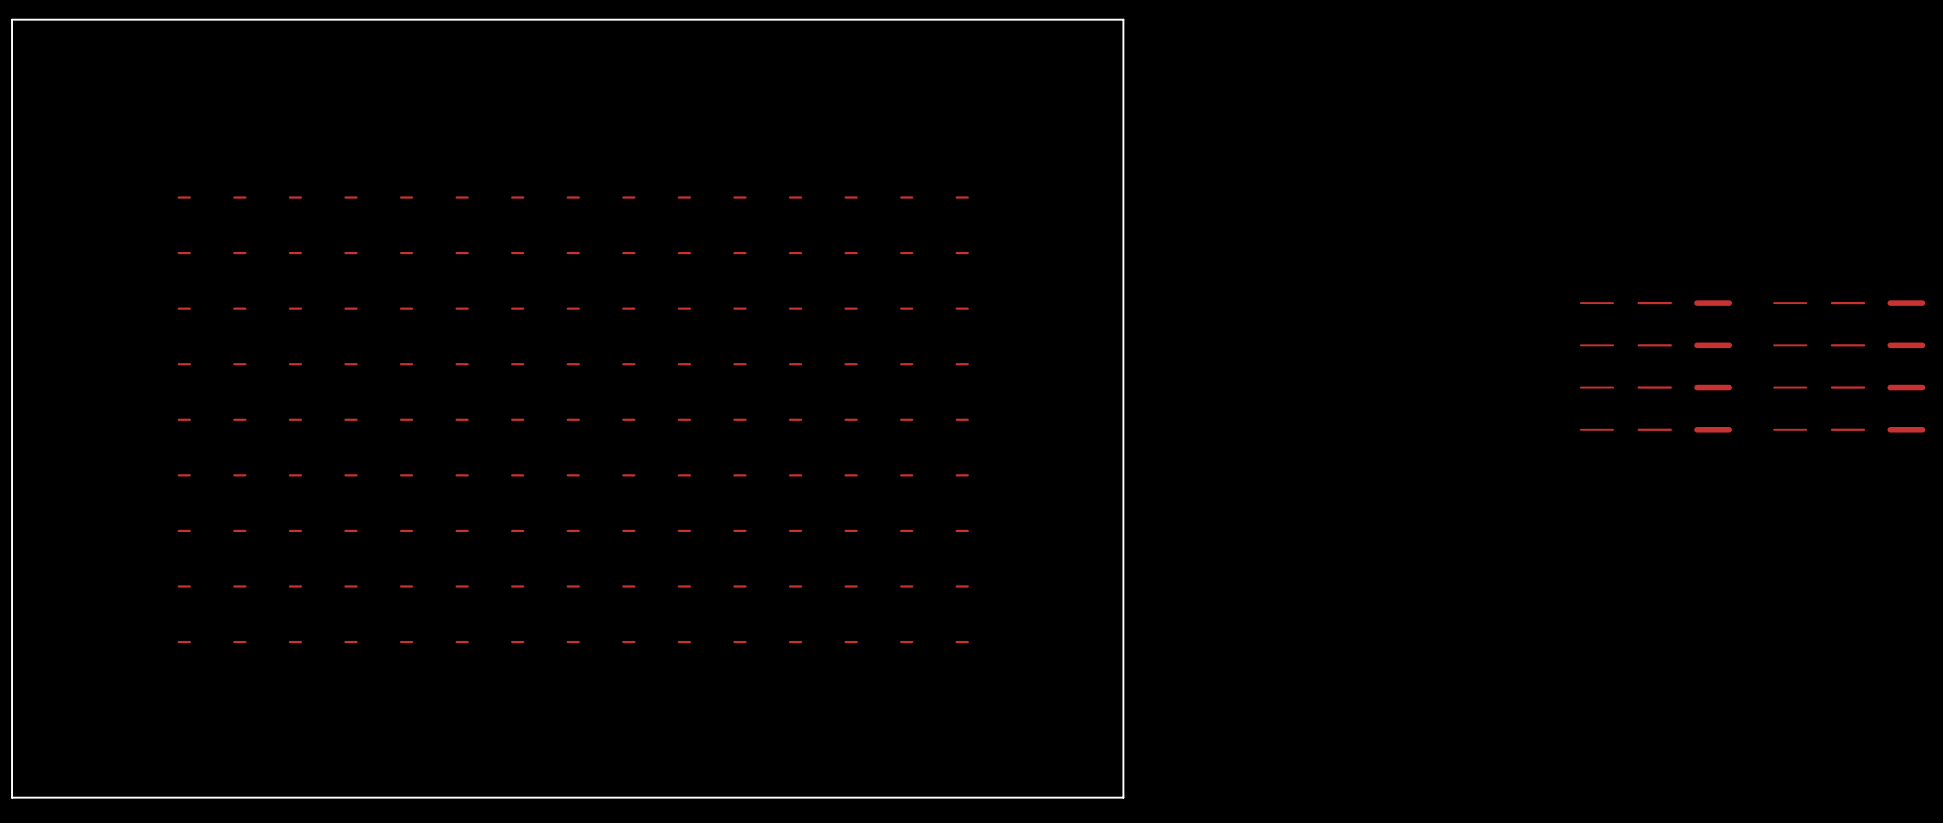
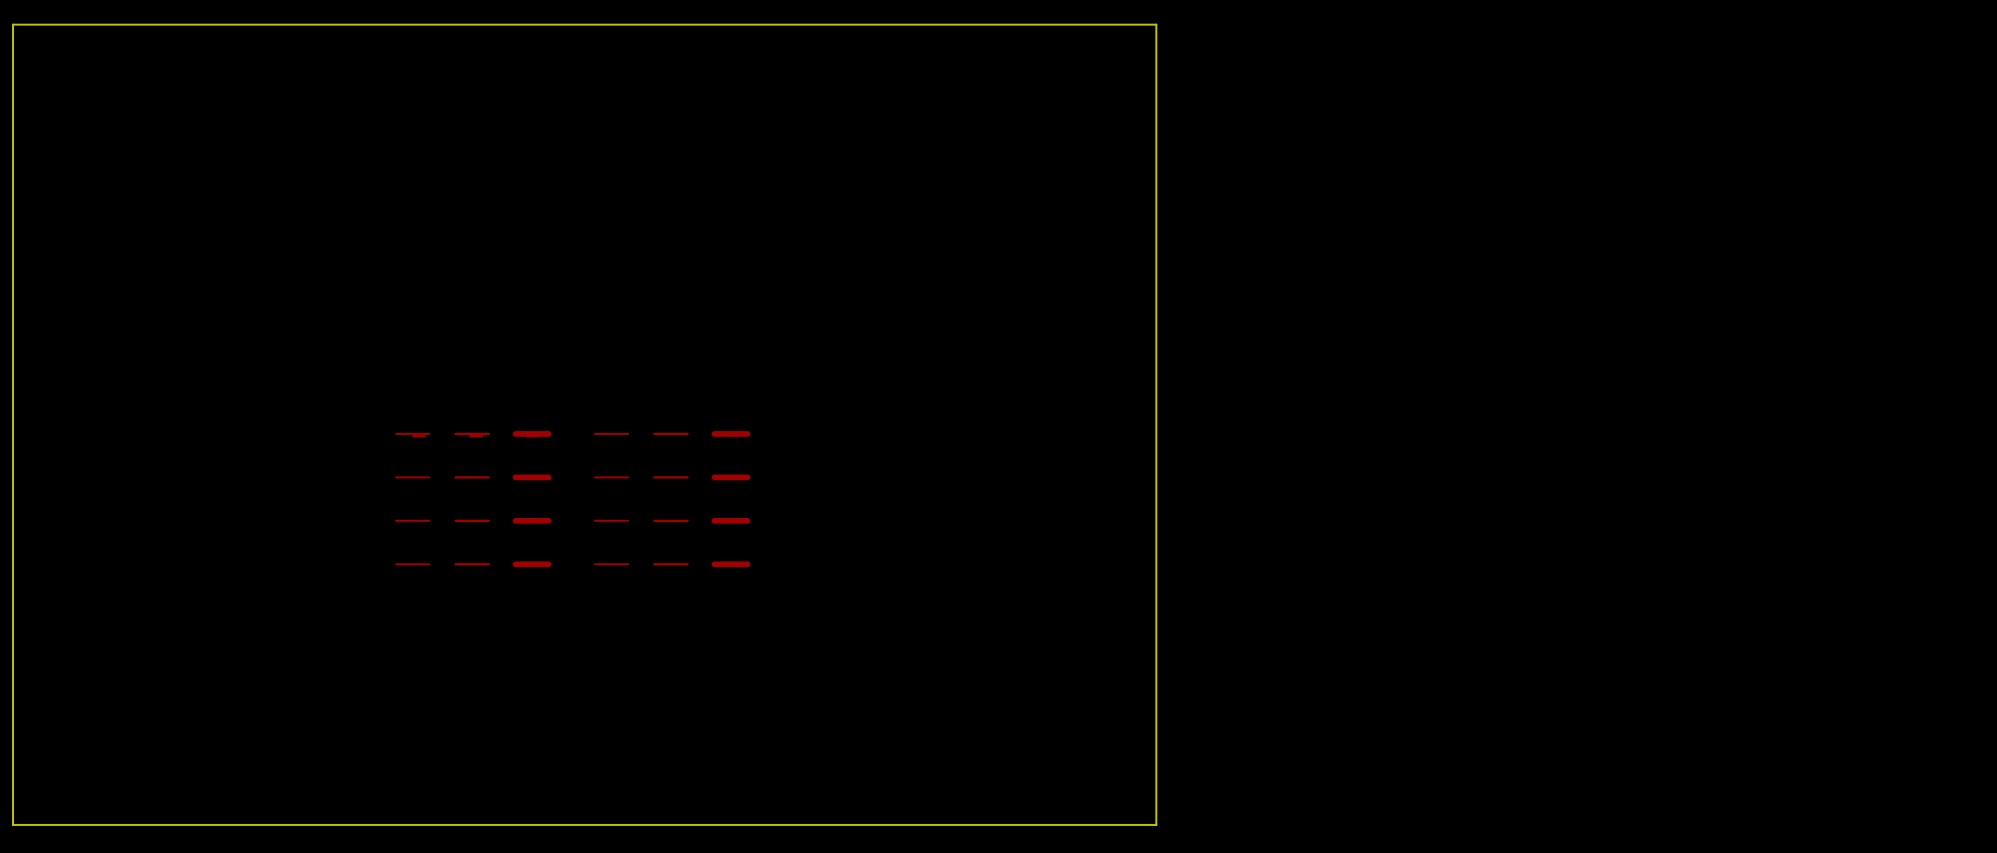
top track: (178, 197) (189, 197) -> none
top track: (234, 197) (245, 197) -> none
top track: (289, 197) (300, 197) -> none
top track: (345, 197) (356, 197) -> none
top track: (401, 197) (412, 197) -> none
top track: (456, 197) (467, 197) -> none
top track: (512, 197) (523, 197) -> none
top track: (567, 197) (578, 197) -> none
top track: (623, 197) (634, 197) -> none
top track: (678, 197) (689, 197) -> none
top track: (734, 197) (745, 197) -> none
top track: (789, 197) (801, 197) -> none
top track: (845, 197) (856, 197) -> none
top track: (901, 197) (912, 197) -> none
top track: (956, 197) (967, 197) -> none
top track: (178, 253) (189, 253) -> none
top track: (234, 253) (245, 253) -> none
top track: (289, 253) (300, 253) -> none
top track: (345, 253) (356, 253) -> none
top track: (401, 253) (412, 253) -> none
top track: (456, 253) (467, 253) -> none
top track: (512, 253) (523, 253) -> none
top track: (567, 253) (578, 253) -> none
top track: (623, 253) (634, 253) -> none
top track: (678, 253) (689, 253) -> none
top track: (734, 253) (745, 253) -> none
top track: (789, 253) (801, 253) -> none
top track: (845, 253) (856, 253) -> none
top track: (901, 253) (912, 253) -> none
top track: (956, 253) (967, 253) -> none
top track: (1580, 303) (1613, 303) -> none
top track: (1638, 303) (1670, 303) -> none
top track: (1696, 303) (1729, 303) -> none
top track: (1774, 303) (1806, 303) -> none
top track: (1831, 303) (1864, 303) -> none
top track: (1890, 303) (1922, 303) -> none
top track: (178, 308) (189, 308) -> none
top track: (234, 308) (245, 308) -> none
top track: (289, 308) (300, 308) -> none
top track: (345, 308) (356, 308) -> none
top track: (401, 308) (412, 308) -> none
top track: (456, 308) (467, 308) -> none
top track: (512, 308) (523, 308) -> none
top track: (567, 308) (578, 308) -> none
top track: (623, 308) (634, 308) -> none
top track: (678, 308) (689, 308) -> none
top track: (734, 308) (745, 308) -> none
top track: (789, 308) (801, 308) -> none
top track: (845, 308) (856, 308) -> none
top track: (901, 308) (912, 308) -> none
top track: (956, 308) (967, 308) -> none
top track: (1580, 345) (1613, 345) -> none
top track: (1638, 345) (1670, 345) -> none
top track: (1696, 345) (1729, 345) -> none
top track: (1774, 345) (1806, 345) -> none
top track: (1831, 345) (1864, 345) -> none
top track: (1890, 345) (1922, 345) -> none
top track: (178, 364) (189, 364) -> none
top track: (234, 364) (245, 364) -> none
top track: (289, 364) (300, 364) -> none
top track: (345, 364) (356, 364) -> none
top track: (401, 364) (412, 364) -> none
top track: (456, 364) (467, 364) -> none
top track: (512, 364) (523, 364) -> none
top track: (567, 364) (578, 364) -> none
top track: (623, 364) (634, 364) -> none
top track: (678, 364) (689, 364) -> none
top track: (734, 364) (745, 364) -> none
top track: (789, 364) (801, 364) -> none
top track: (845, 364) (856, 364) -> none
top track: (901, 364) (912, 364) -> none
top track: (956, 364) (967, 364) -> none
top track: (1580, 387) (1613, 387) -> none
top track: (1638, 387) (1670, 387) -> none
top track: (1696, 387) (1729, 387) -> none
top track: (1774, 387) (1806, 387) -> none
top track: (1831, 387) (1864, 387) -> none
top track: (1890, 387) (1922, 387) -> none
top track: none -> (396, 433) (429, 433)
top track: none -> (455, 433) (488, 433)
top track: none -> (515, 433) (548, 433)
top track: none -> (594, 433) (628, 433)
top track: none -> (654, 433) (687, 433)
top track: none -> (714, 433) (747, 433)
top track: (178, 419) (189, 419) -> none
top track: (234, 419) (245, 419) -> none
top track: (289, 419) (300, 419) -> none
top track: (345, 419) (356, 419) -> none
top track: (567, 419) (578, 419) -> none
top track: (623, 419) (634, 419) -> none
top track: (678, 419) (689, 419) -> none
top track: (734, 419) (745, 419) -> none
top track: (789, 419) (801, 419) -> none
top track: (845, 419) (856, 419) -> none
top track: (901, 419) (912, 419) -> none
top track: (956, 419) (967, 419) -> none
top track: (1580, 429) (1613, 429) -> none
top track: (1638, 429) (1670, 429) -> none
top track: (1696, 429) (1729, 429) -> none
top track: (1774, 429) (1806, 429) -> none
top track: (1831, 429) (1864, 429) -> none
top track: (1890, 429) (1922, 429) -> none
top track: none -> (396, 477) (429, 477)
top track: none -> (455, 477) (488, 477)
top track: none -> (515, 477) (548, 477)
top track: none -> (594, 477) (628, 477)
top track: none -> (654, 477) (687, 477)
top track: none -> (714, 477) (747, 477)
top track: (178, 475) (189, 475) -> none
top track: (234, 475) (245, 475) -> none
top track: (289, 475) (300, 475) -> none
top track: (345, 475) (356, 475) -> none
top track: (401, 475) (412, 475) -> none
top track: (456, 475) (467, 475) -> none
top track: (512, 475) (523, 475) -> none
top track: (567, 475) (578, 475) -> none
top track: (623, 475) (634, 475) -> none
top track: (678, 475) (689, 475) -> none
top track: (734, 475) (745, 475) -> none
top track: (789, 475) (801, 475) -> none
top track: (845, 475) (856, 475) -> none
top track: (901, 475) (912, 475) -> none
top track: (956, 475) (967, 475) -> none
top track: none -> (396, 520) (429, 520)
top track: none -> (455, 520) (488, 520)
top track: none -> (515, 520) (548, 520)
top track: none -> (594, 520) (628, 520)
top track: none -> (654, 520) (687, 520)
top track: none -> (714, 520) (747, 520)
top track: (178, 530) (189, 530) -> none
top track: (234, 530) (245, 530) -> none
top track: (289, 530) (300, 530) -> none
top track: (345, 530) (356, 530) -> none
top track: (401, 530) (412, 530) -> none
top track: (456, 530) (467, 530) -> none
top track: (512, 530) (523, 530) -> none
top track: (567, 530) (578, 530) -> none
top track: (623, 530) (634, 530) -> none
top track: (678, 530) (689, 530) -> none
top track: (734, 530) (745, 530) -> none
top track: (789, 530) (801, 530) -> none
top track: (845, 530) (856, 530) -> none
top track: (901, 530) (912, 530) -> none
top track: (956, 530) (967, 530) -> none
top track: none -> (396, 564) (429, 564)
top track: none -> (455, 564) (488, 564)
top track: none -> (515, 564) (548, 564)
top track: none -> (594, 564) (628, 564)
top track: none -> (654, 564) (687, 564)
top track: none -> (714, 564) (747, 564)
top track: (178, 586) (189, 586) -> none
top track: (234, 586) (245, 586) -> none
top track: (289, 586) (300, 586) -> none
top track: (345, 586) (356, 586) -> none
top track: (401, 586) (412, 586) -> none
top track: (456, 586) (467, 586) -> none
top track: (512, 586) (523, 586) -> none
top track: (567, 586) (578, 586) -> none
top track: (623, 586) (634, 586) -> none
top track: (678, 586) (689, 586) -> none
top track: (734, 586) (745, 586) -> none
top track: (789, 586) (801, 586) -> none
top track: (845, 586) (856, 586) -> none
top track: (901, 586) (912, 586) -> none
top track: (956, 586) (967, 586) -> none
top track: (178, 642) (189, 642) -> none
top track: (234, 642) (245, 642) -> none
top track: (289, 642) (300, 642) -> none
top track: (345, 642) (356, 642) -> none
top track: (401, 642) (412, 642) -> none
top track: (456, 642) (467, 642) -> none
top track: (512, 642) (523, 642) -> none
top track: (567, 642) (578, 642) -> none
top track: (623, 642) (634, 642) -> none
top track: (678, 642) (689, 642) -> none
top track: (734, 642) (745, 642) -> none
top track: (789, 642) (801, 642) -> none
top track: (845, 642) (856, 642) -> none
top track: (901, 642) (912, 642) -> none
top track: (956, 642) (967, 642) -> none

